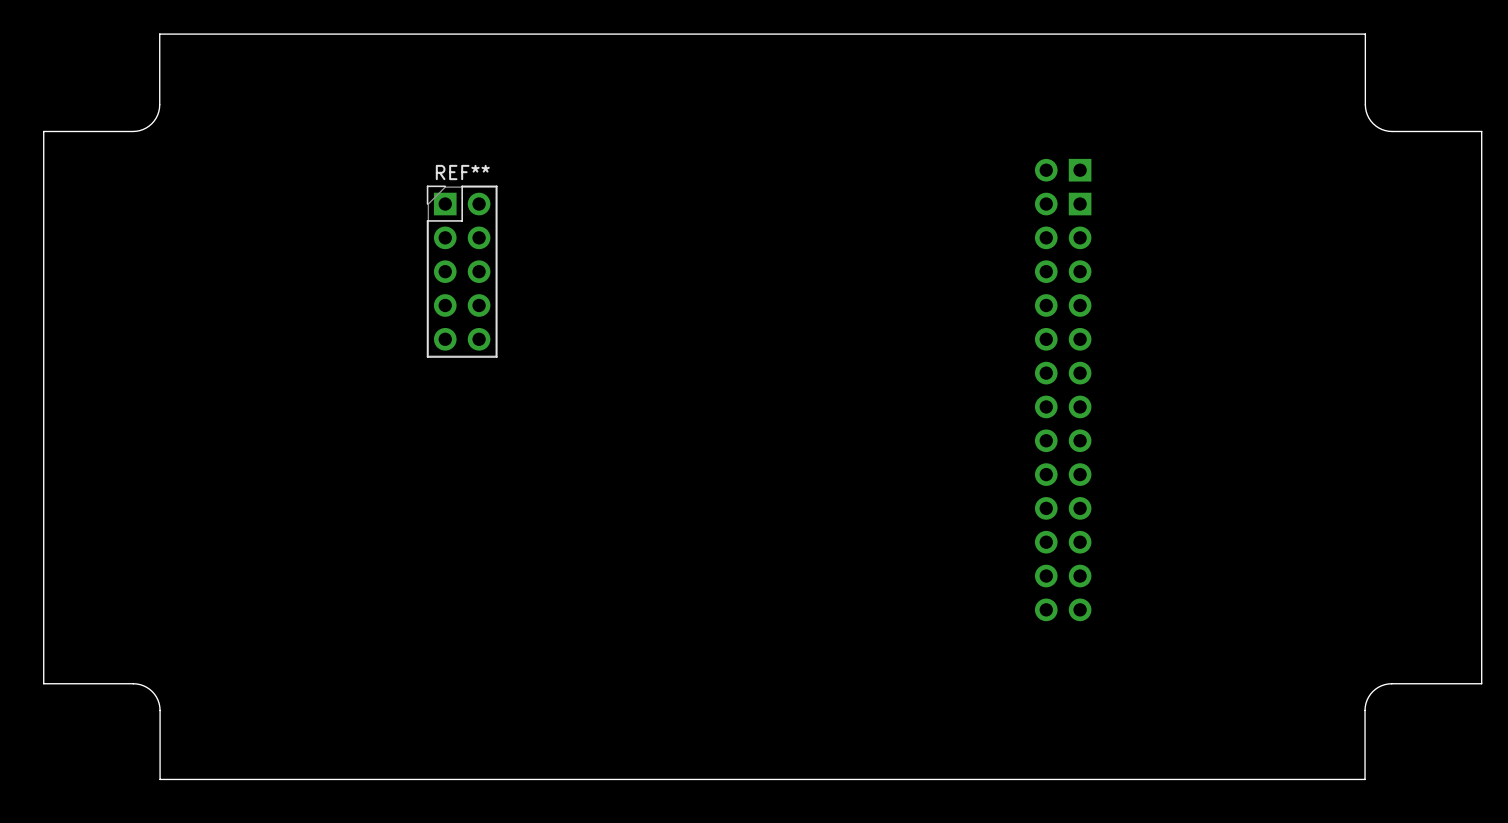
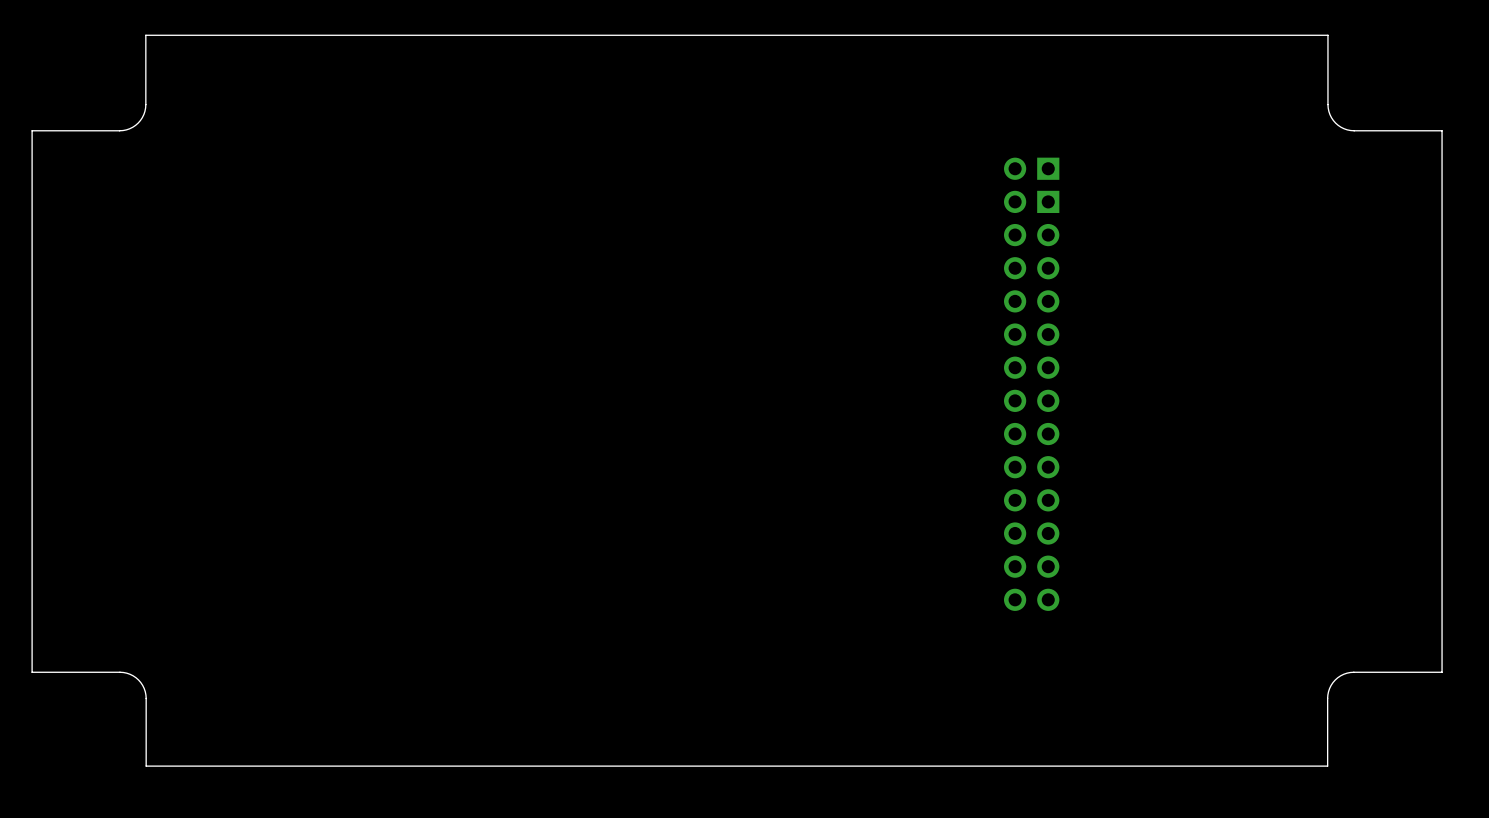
REF**: (462, 271) -> none

